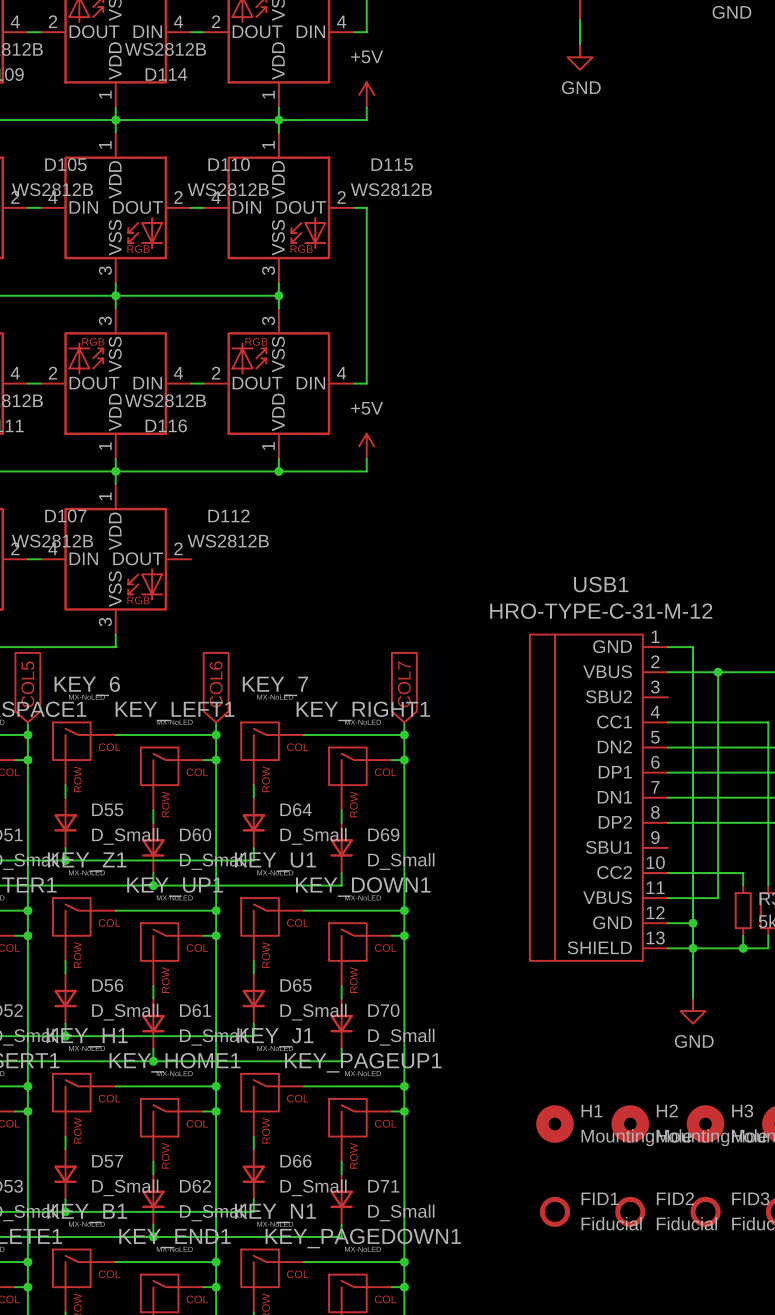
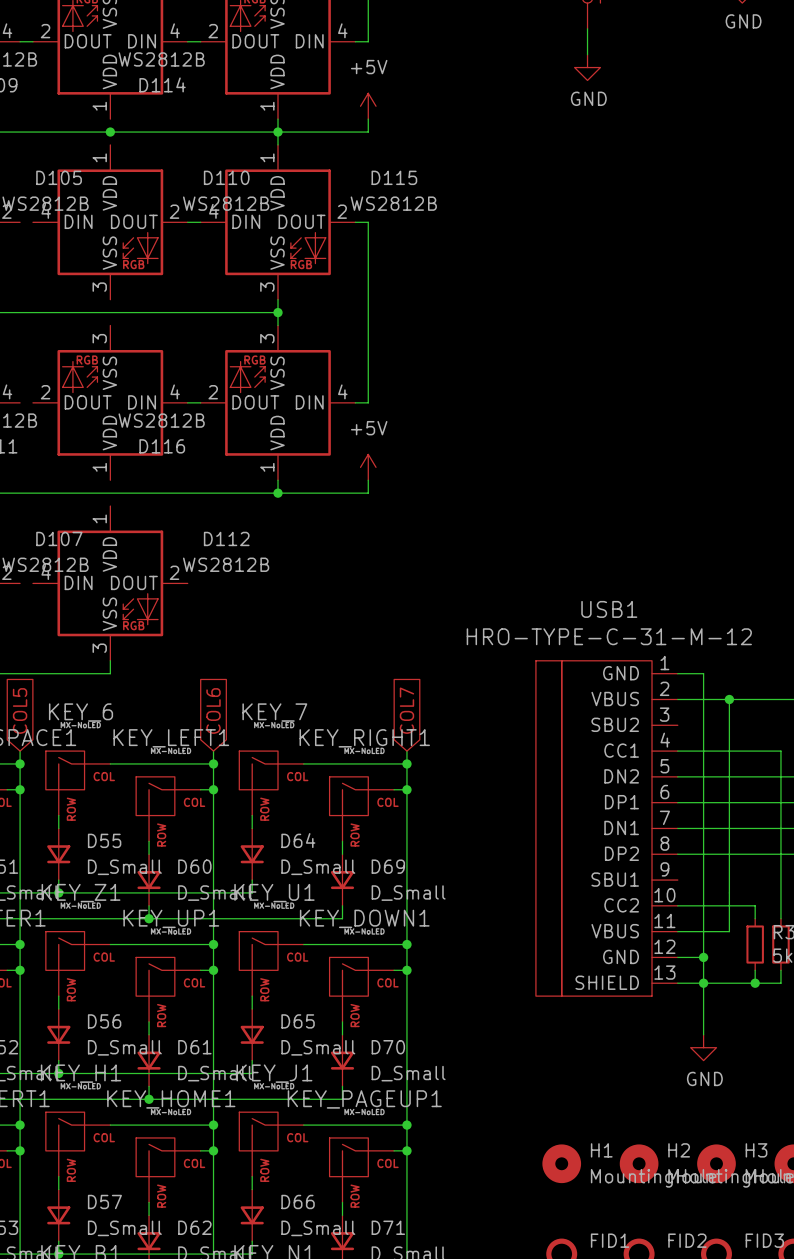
wire: (115, 107) (115, 132) -> none
wire: (27, 207) (40, 207) -> none
wire: (115, 283) (115, 308) -> none
junction: (115, 295) -> none
wire: (27, 383) (40, 383) -> none
wire: (115, 458) (115, 483) -> none
junction: (115, 471) -> none
wire: (27, 559) (40, 559) -> none

